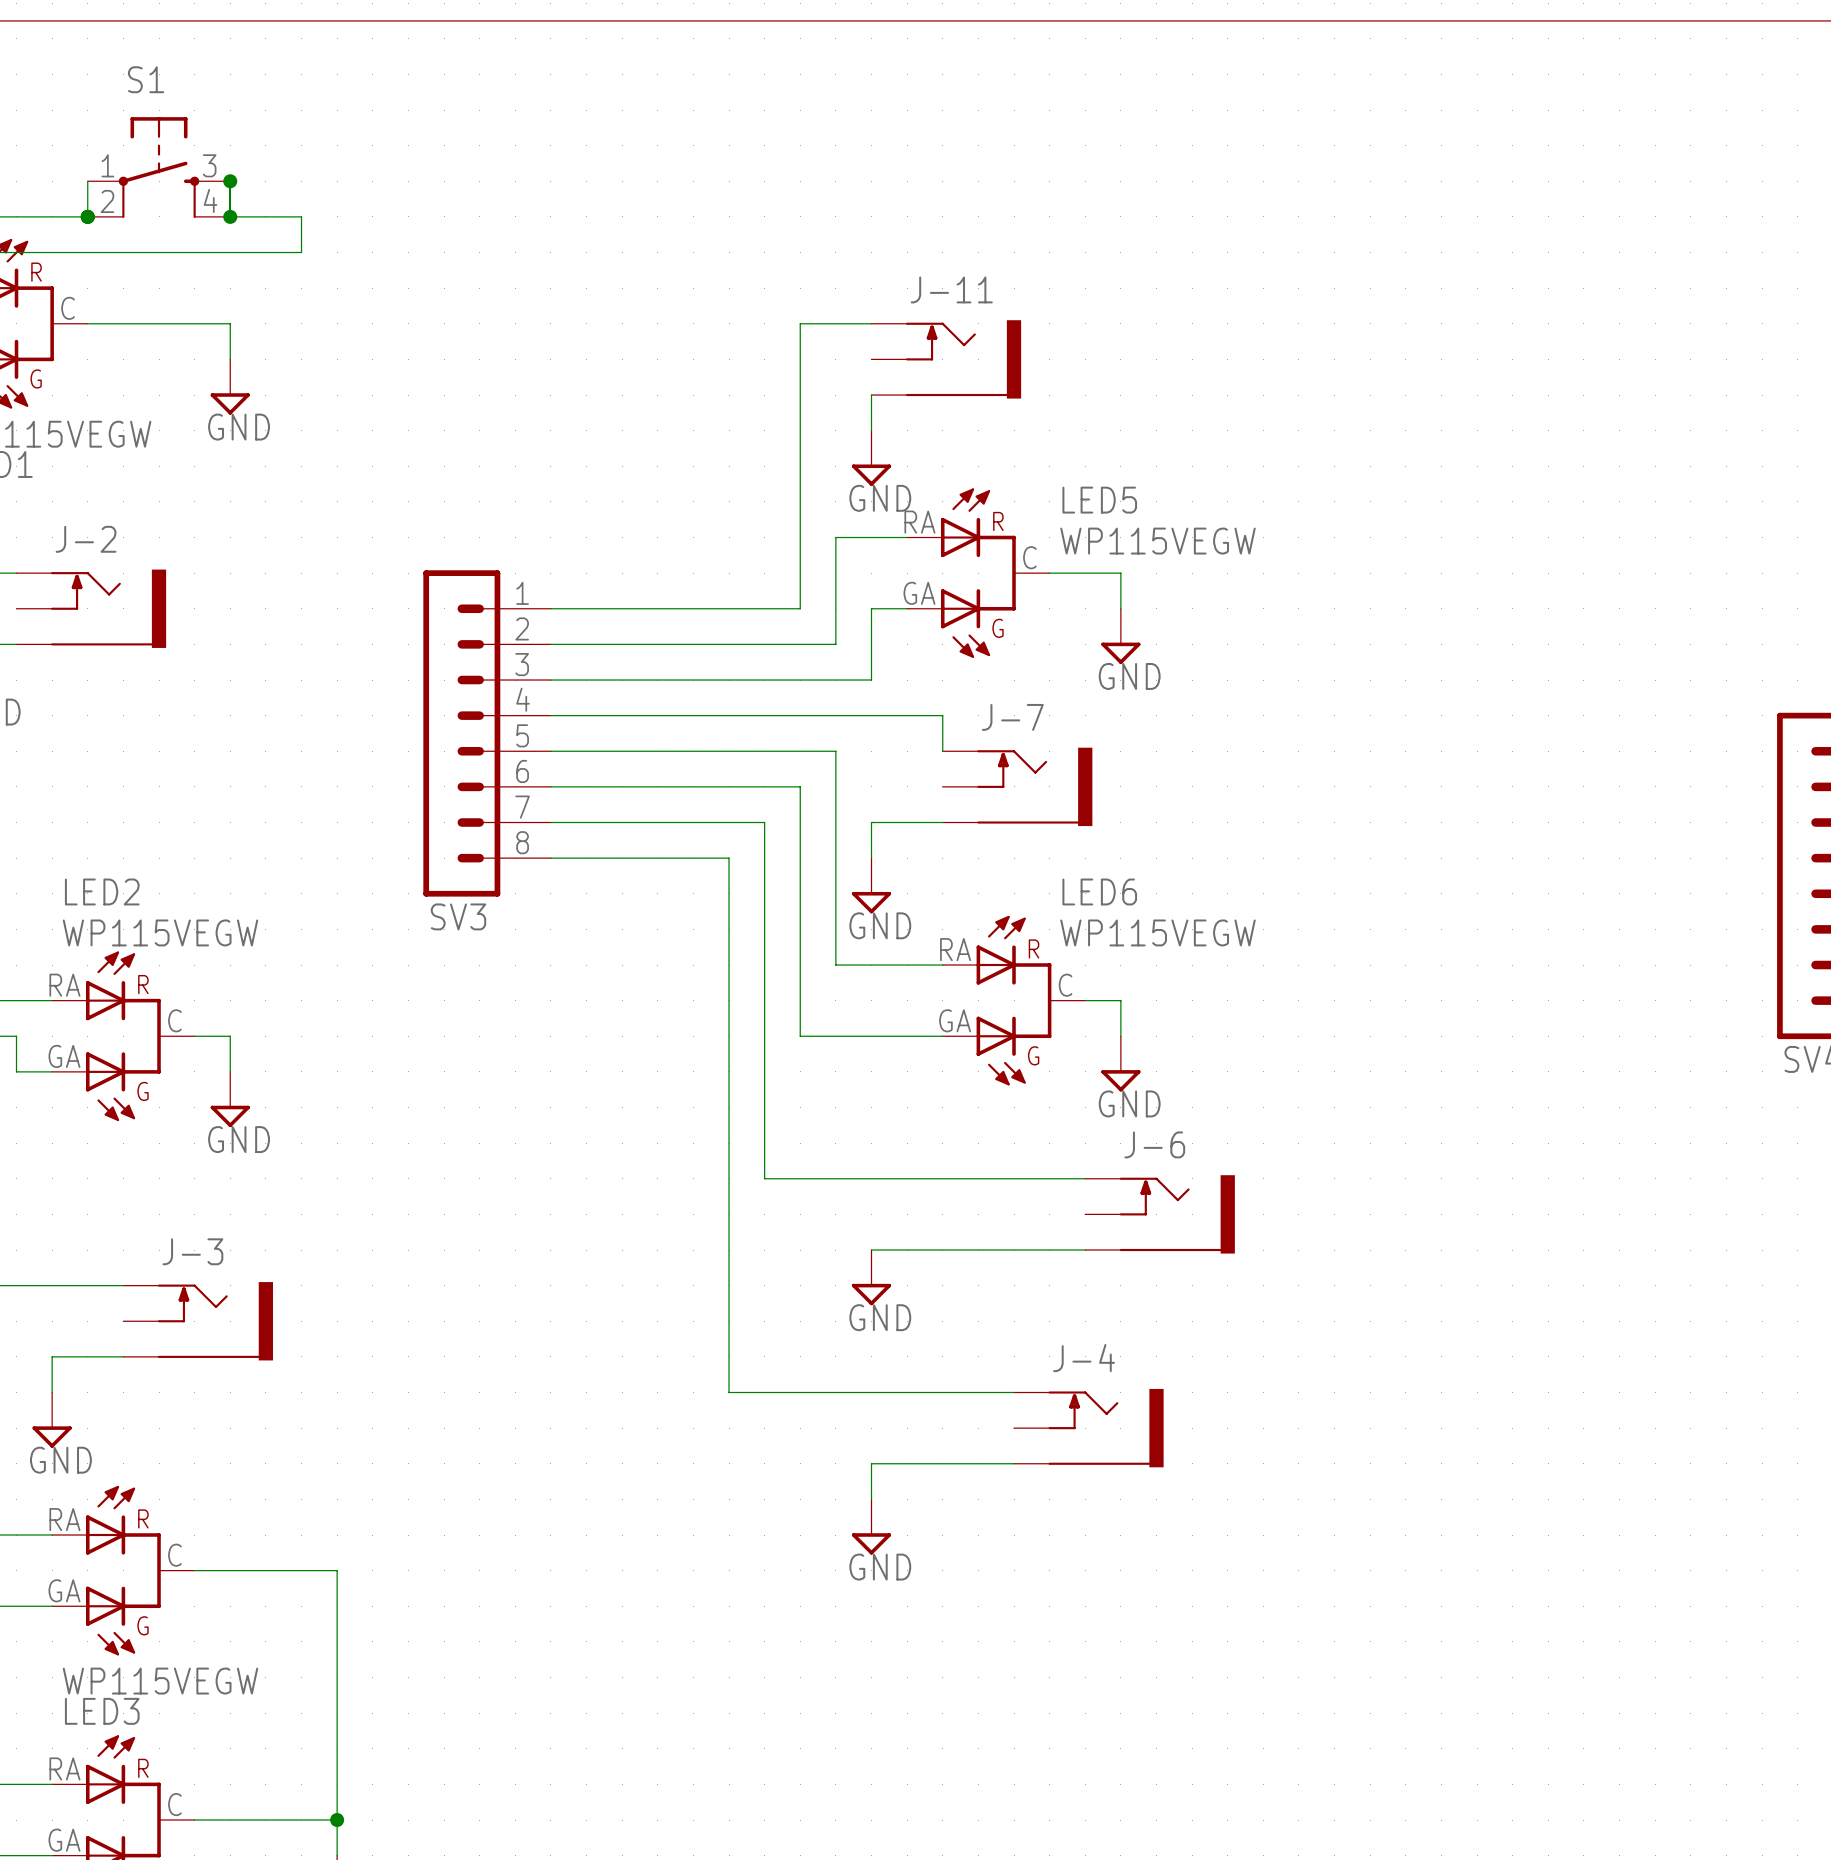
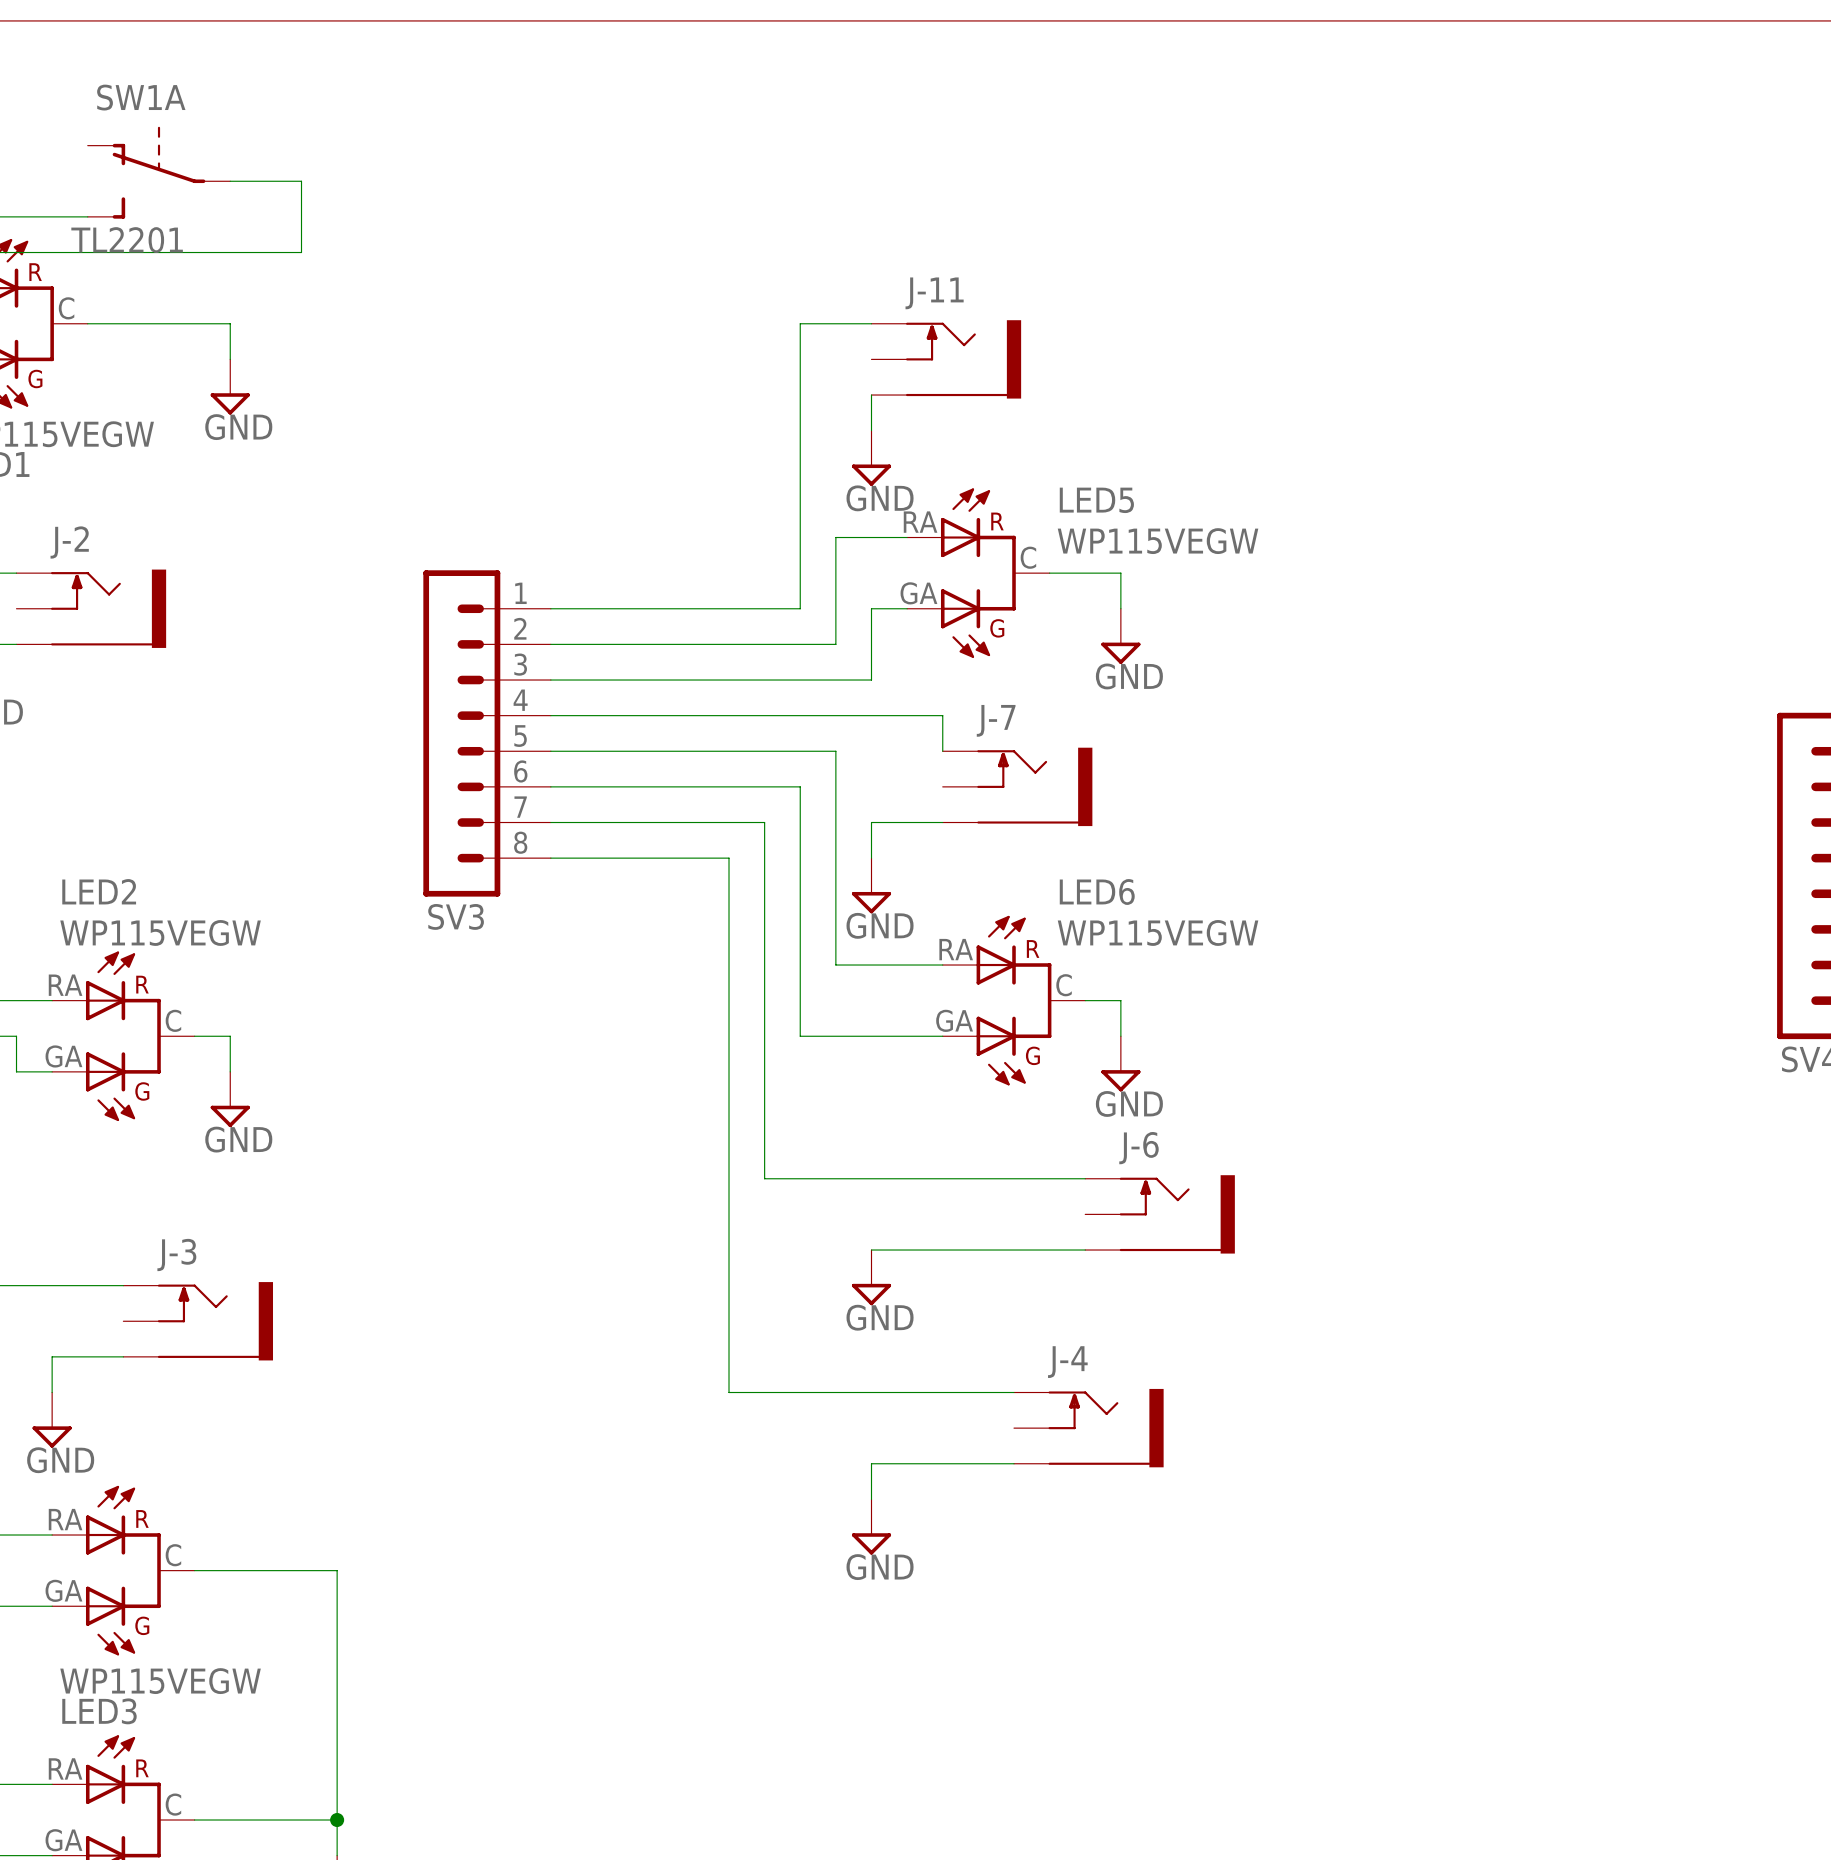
S1: (159, 167) -> none
SW1A: none -> TL2201 (159, 172)
wire: (87, 181) (87, 216) -> none
wire: (230, 181) (230, 216) (301, 216) -> (230, 181) (301, 181) (301, 216)
junction: (230, 181) -> none
junction: (87, 216) -> none
junction: (230, 216) -> none

